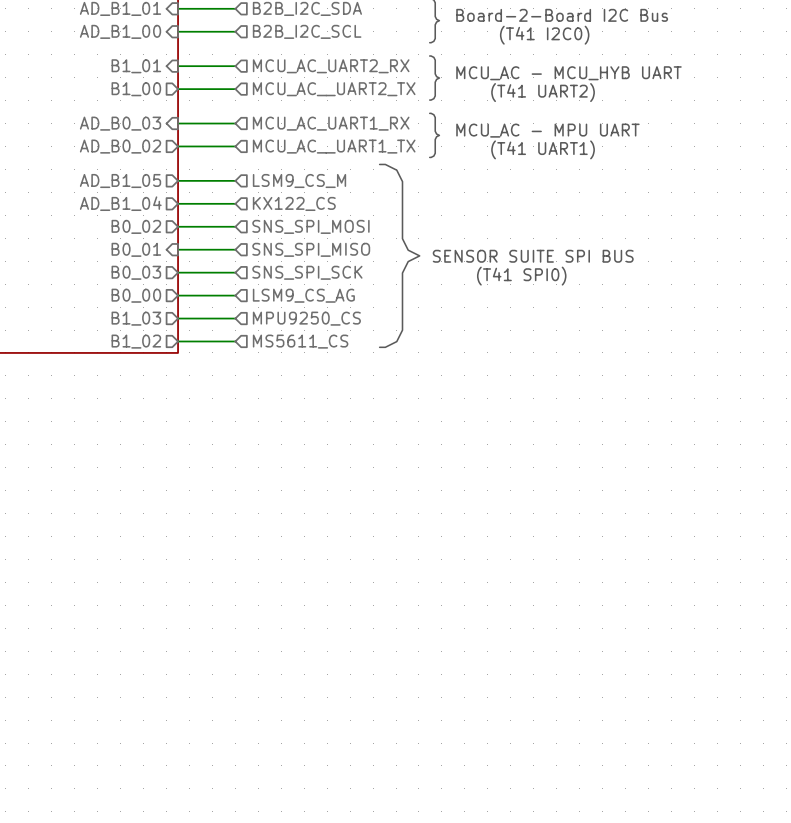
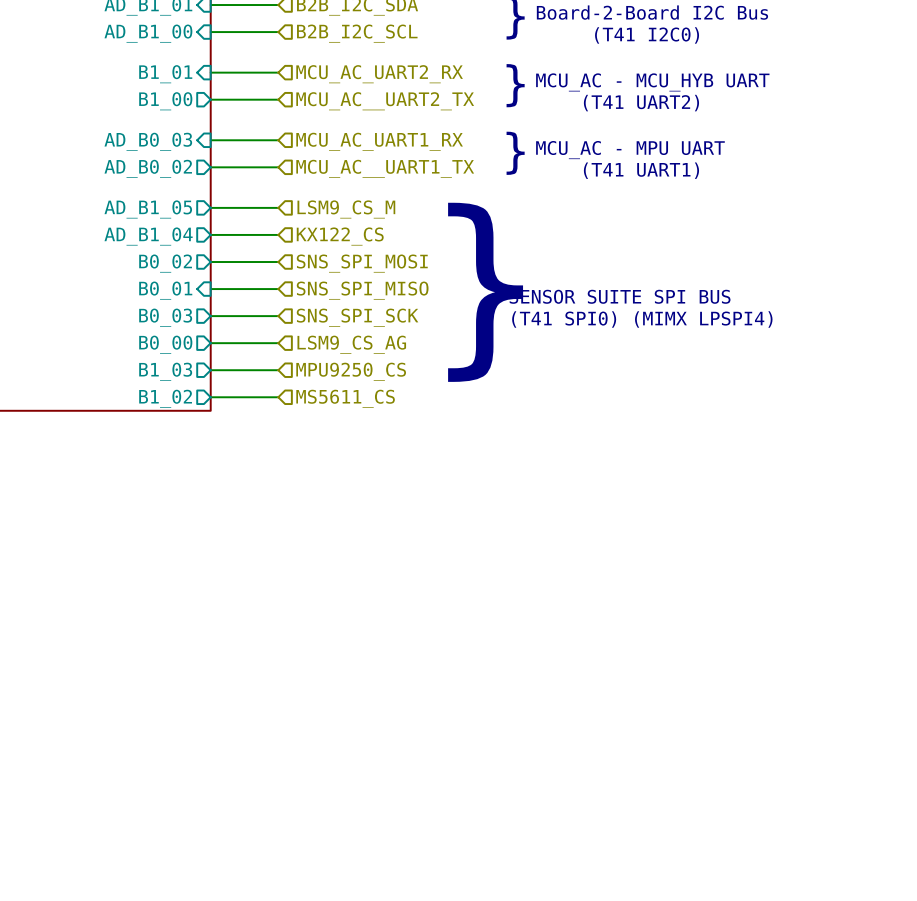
text: (T41 SPI0) (521, 276) -> (T41 SPI0) (MIMX LPSPI4) (642, 319)

